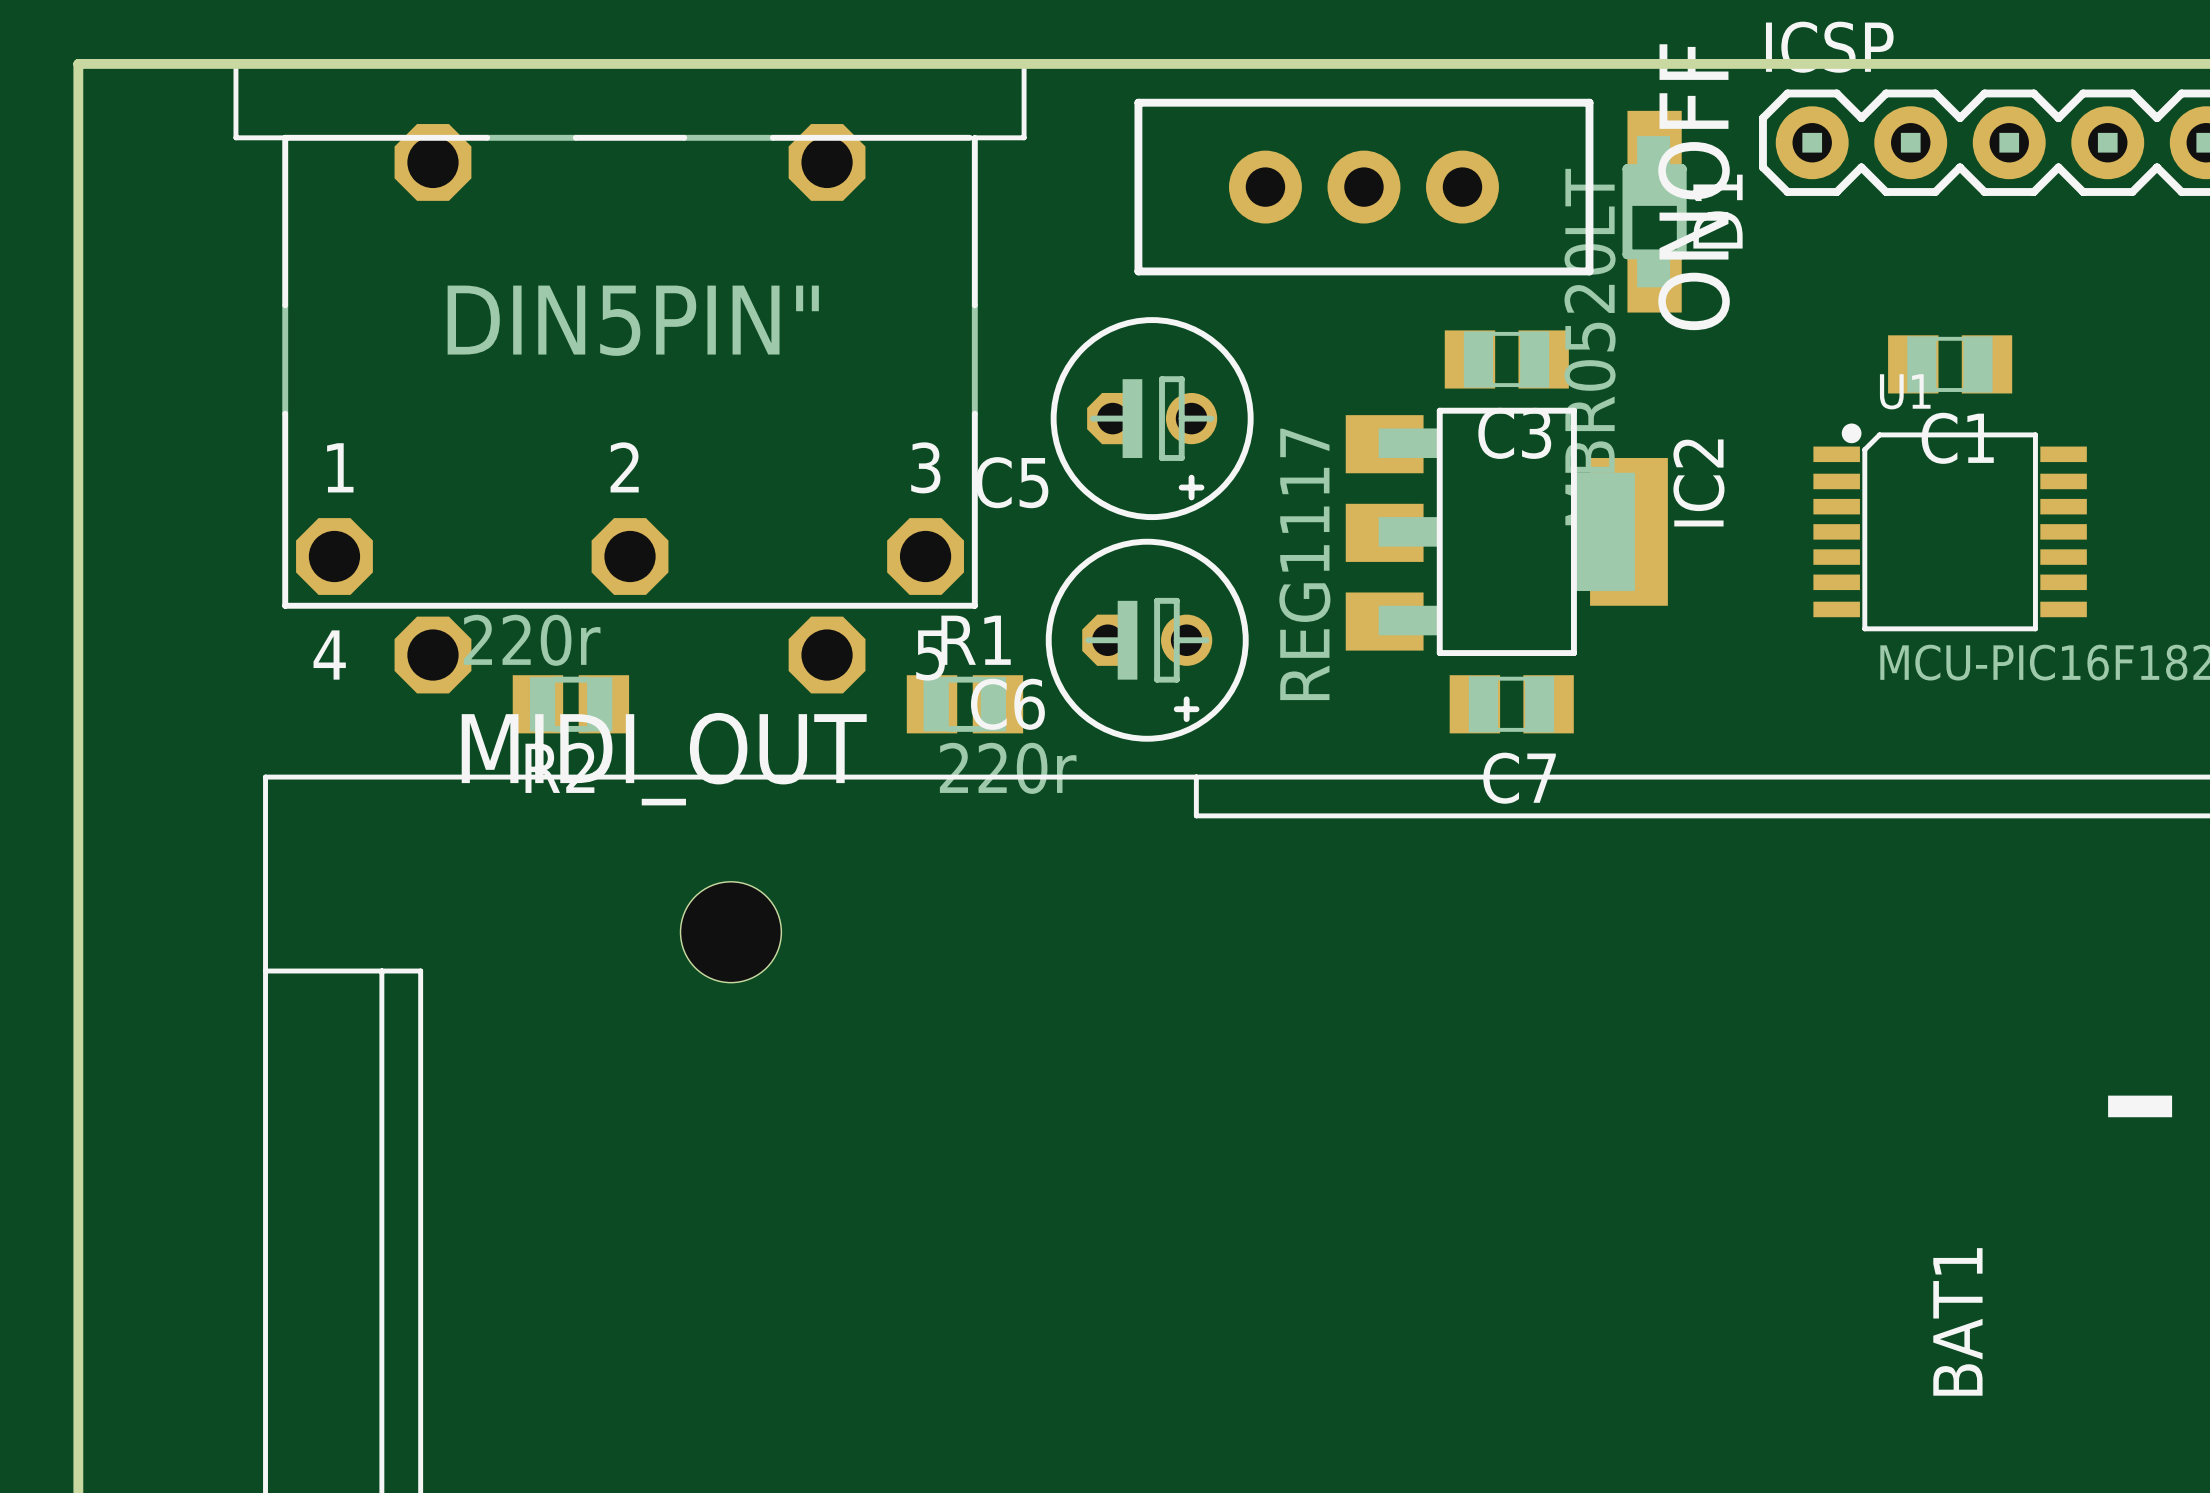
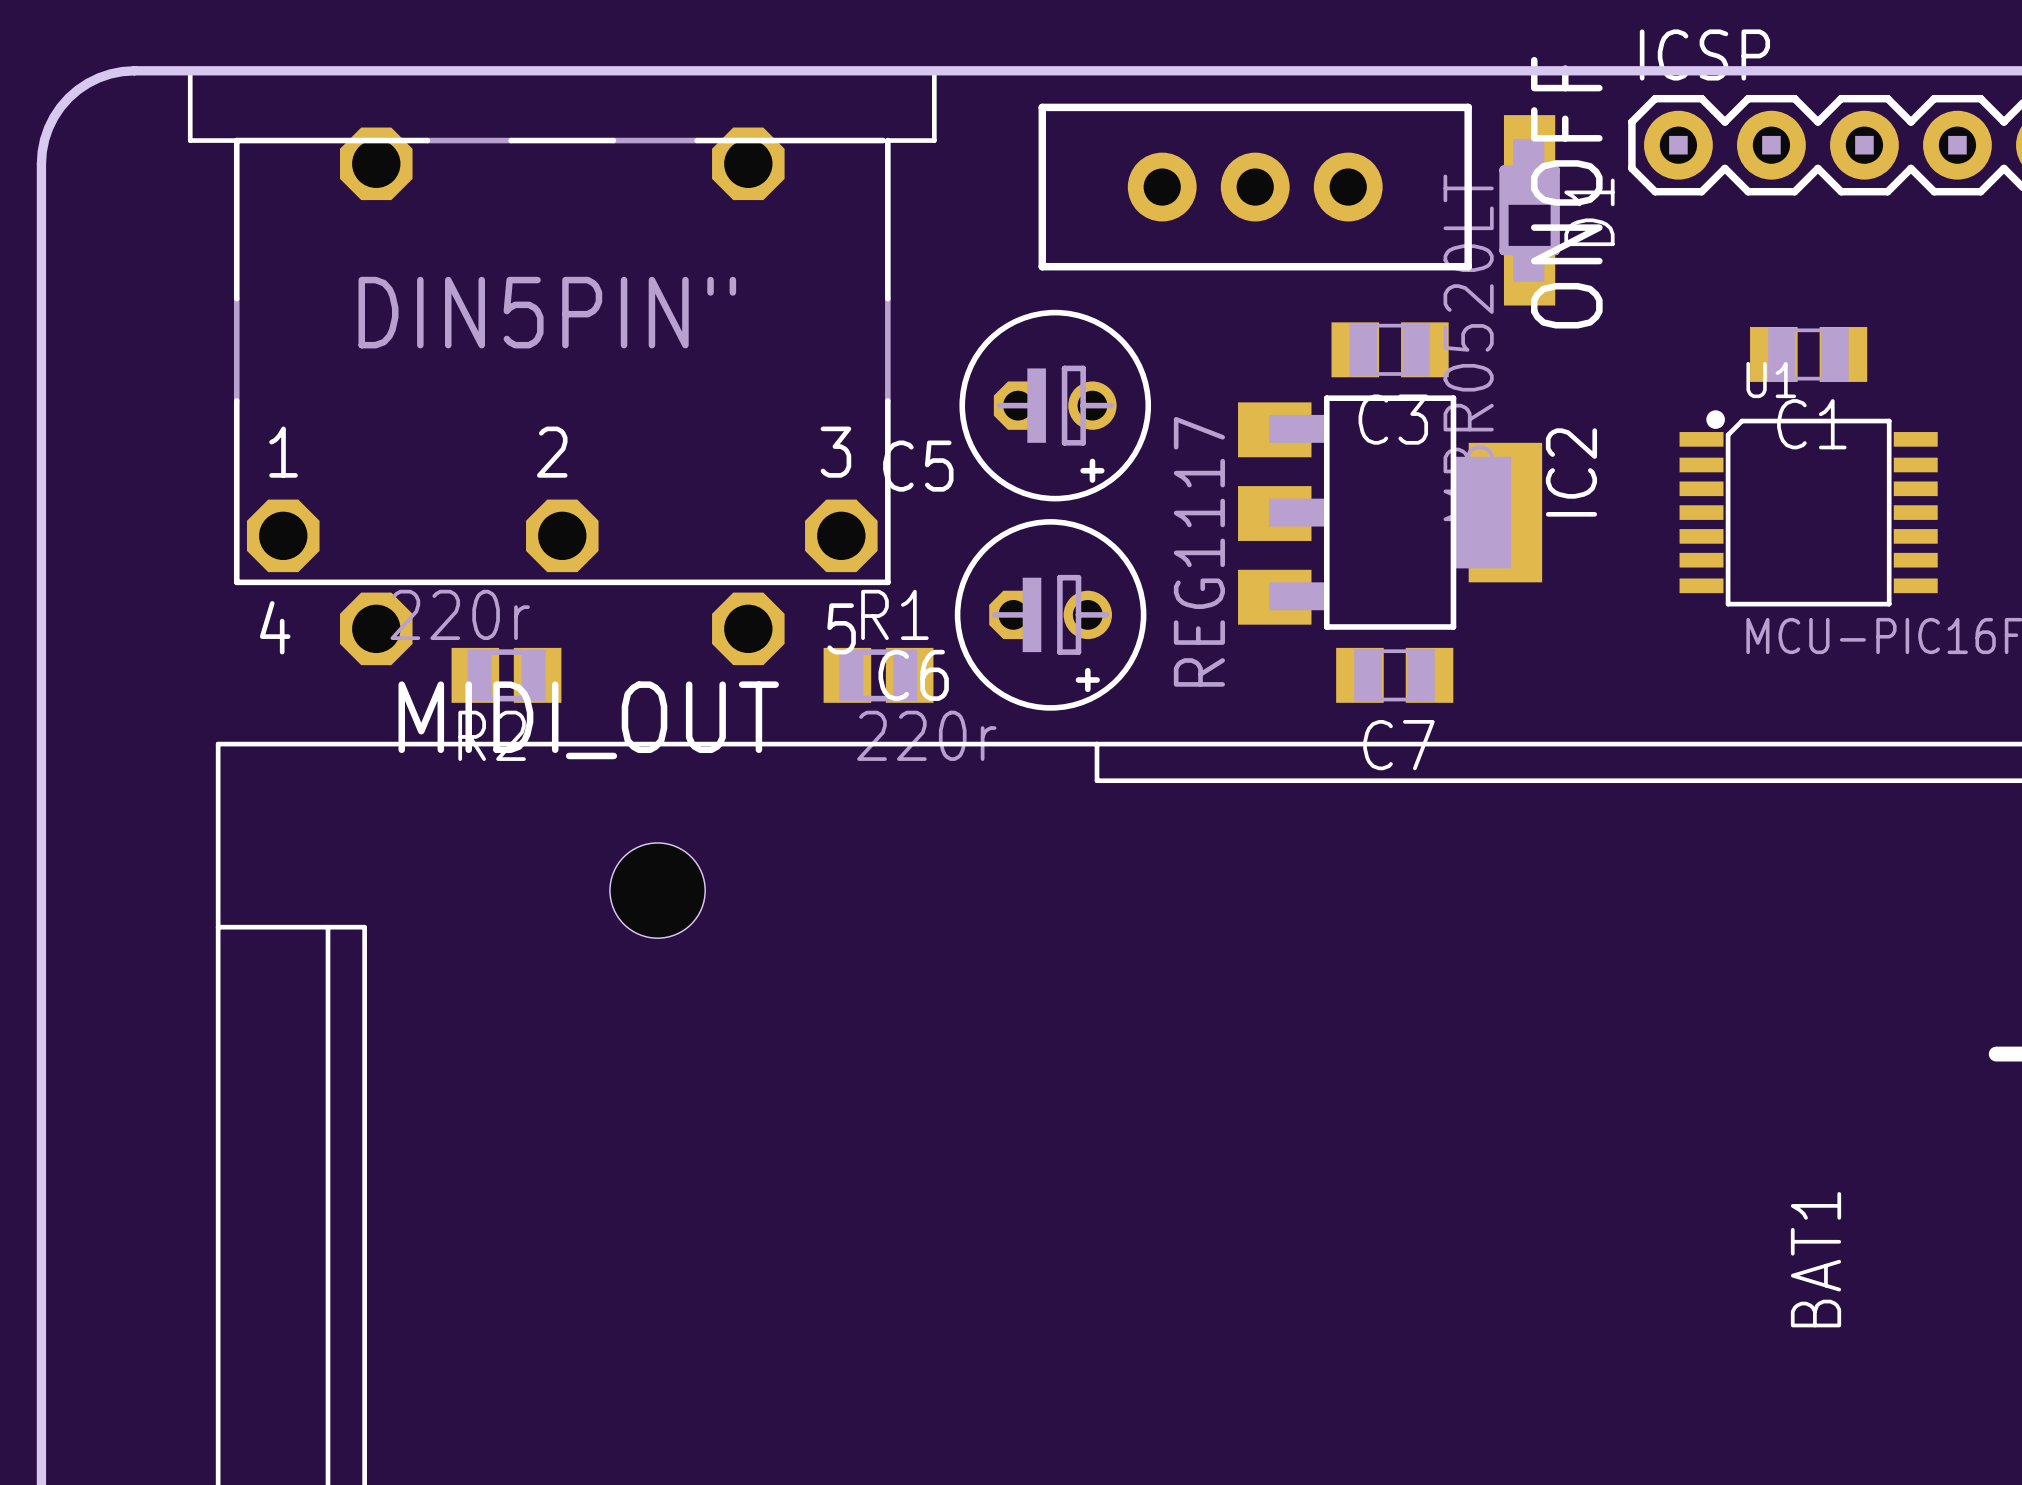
board edge: (176, 63) (78, 63) (78, 162) -> (134, 70) (110, 73) (98, 77) (77, 90) (68, 98) (60, 107) (48, 128) (44, 139) (41, 163)

